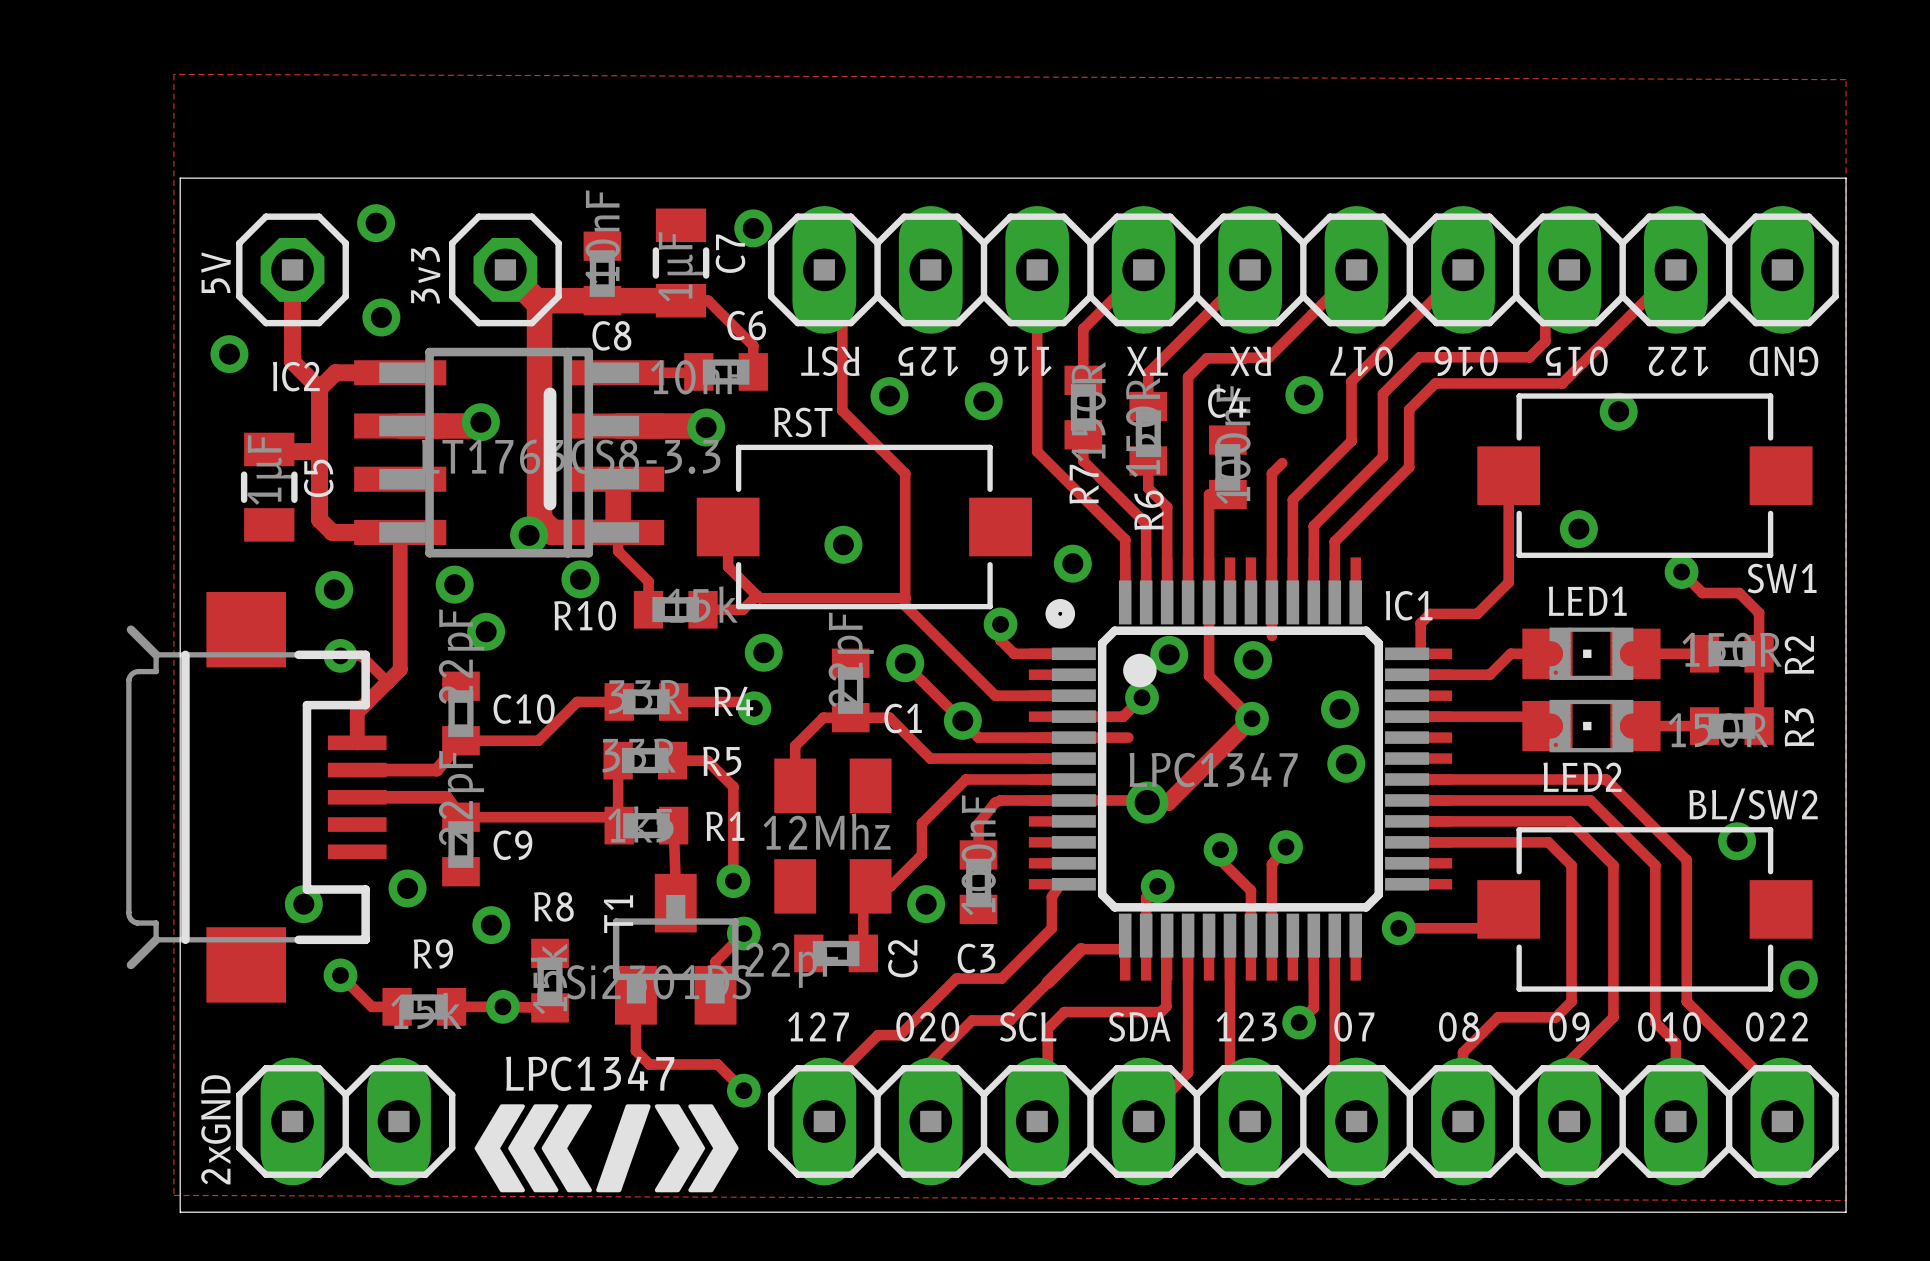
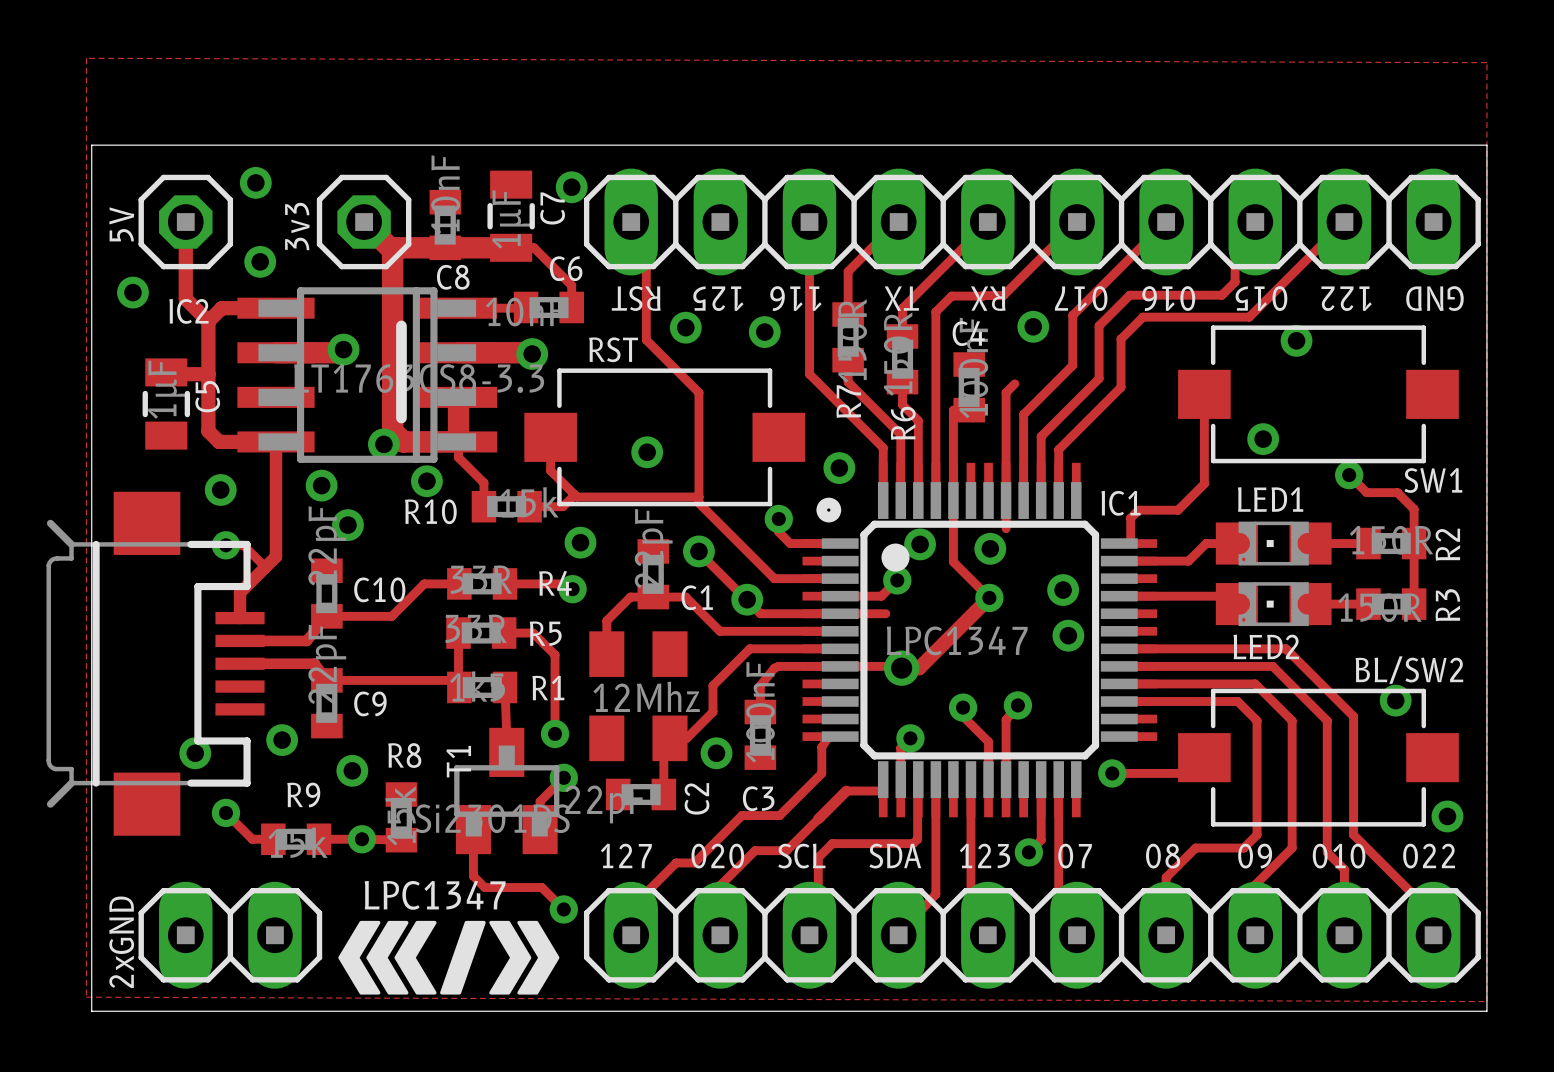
text position: 12Mhz (827, 831) -> 12Mhz (646, 696)

